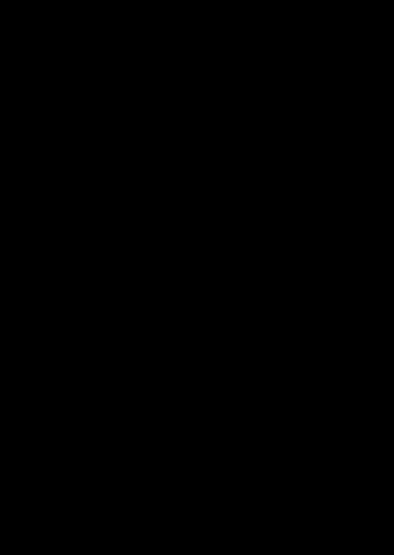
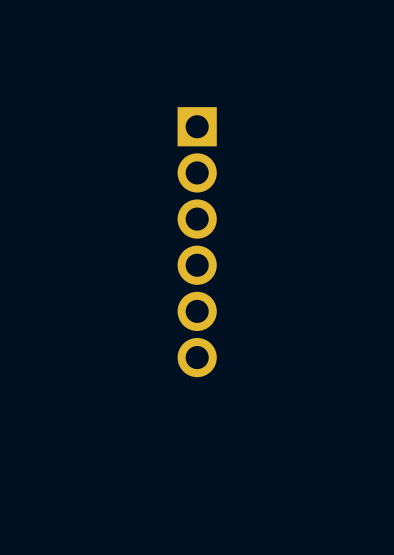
part: none -> (197, 242)

